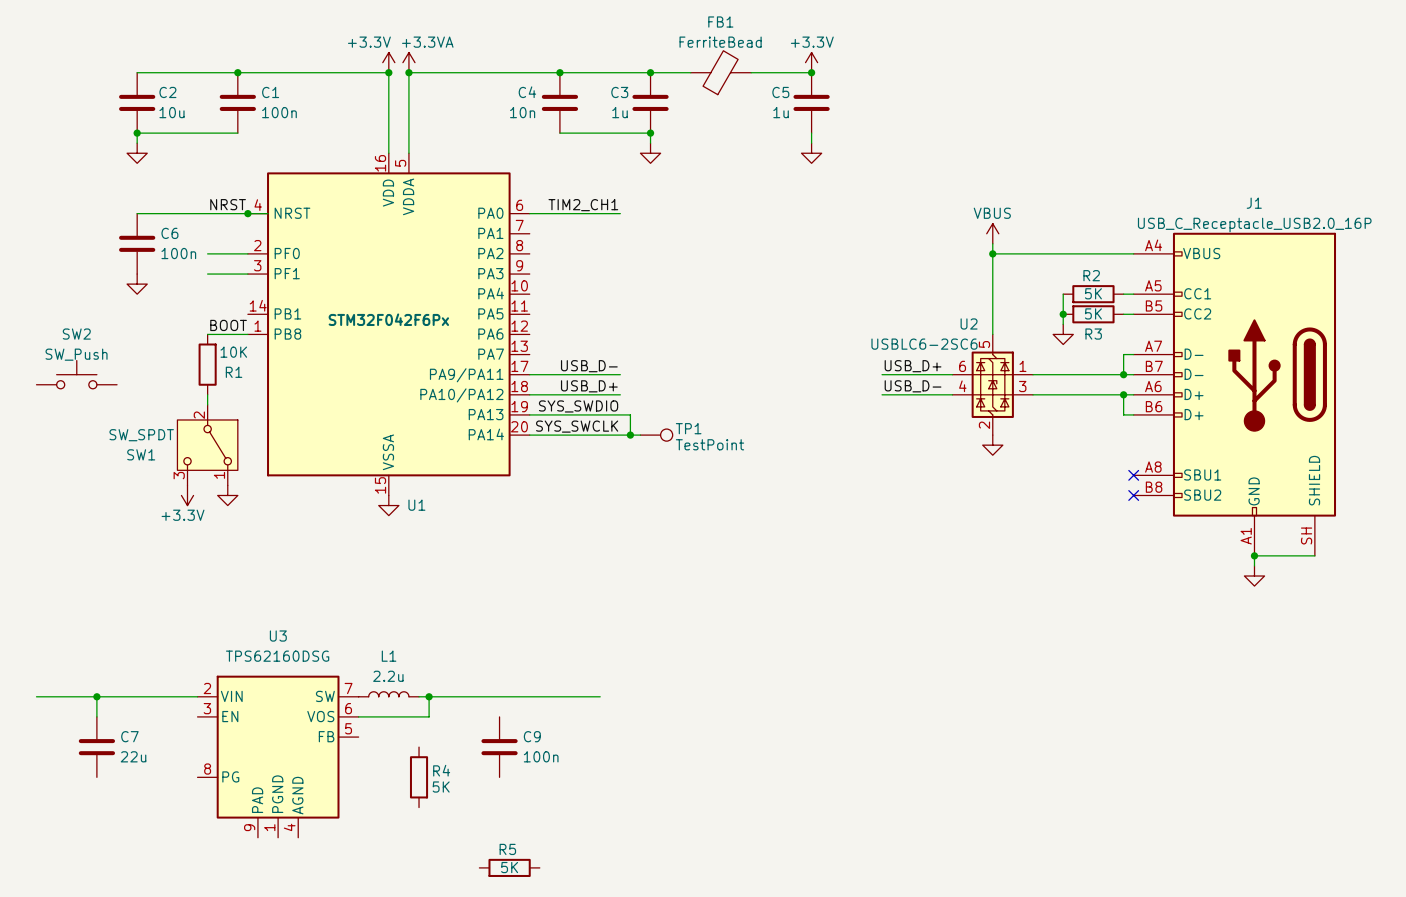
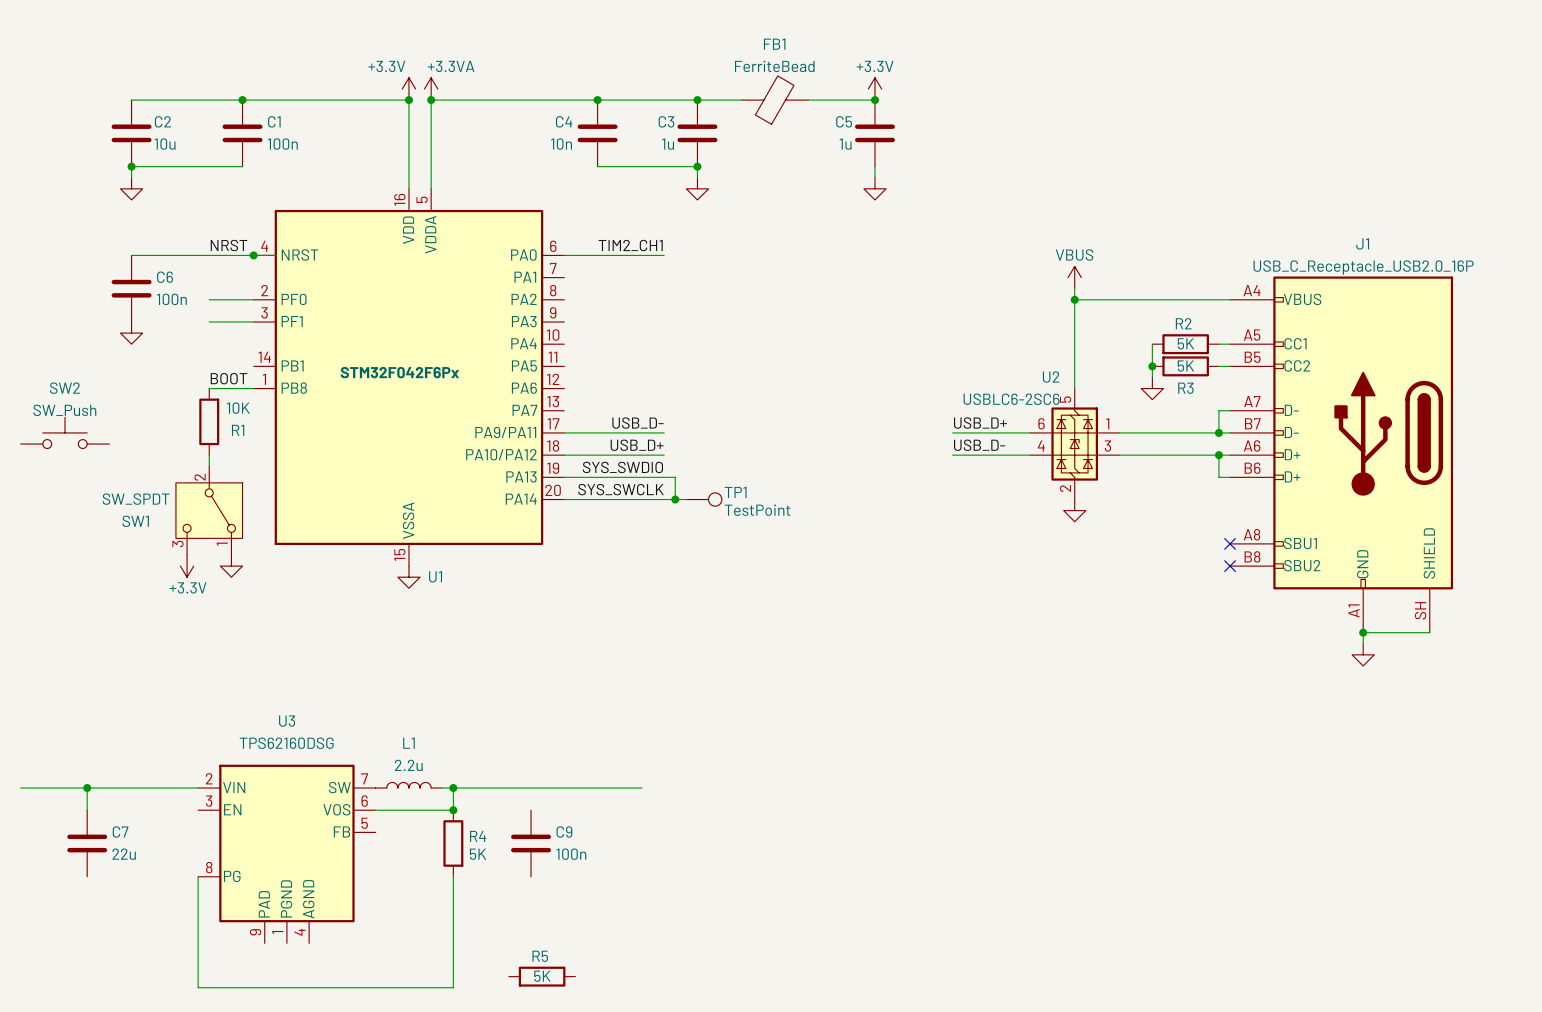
junction: none -> (453, 810)
wire: none -> (198, 876) (198, 987) (453, 987) (453, 876)
R4 position: (419, 777) -> (453, 843)

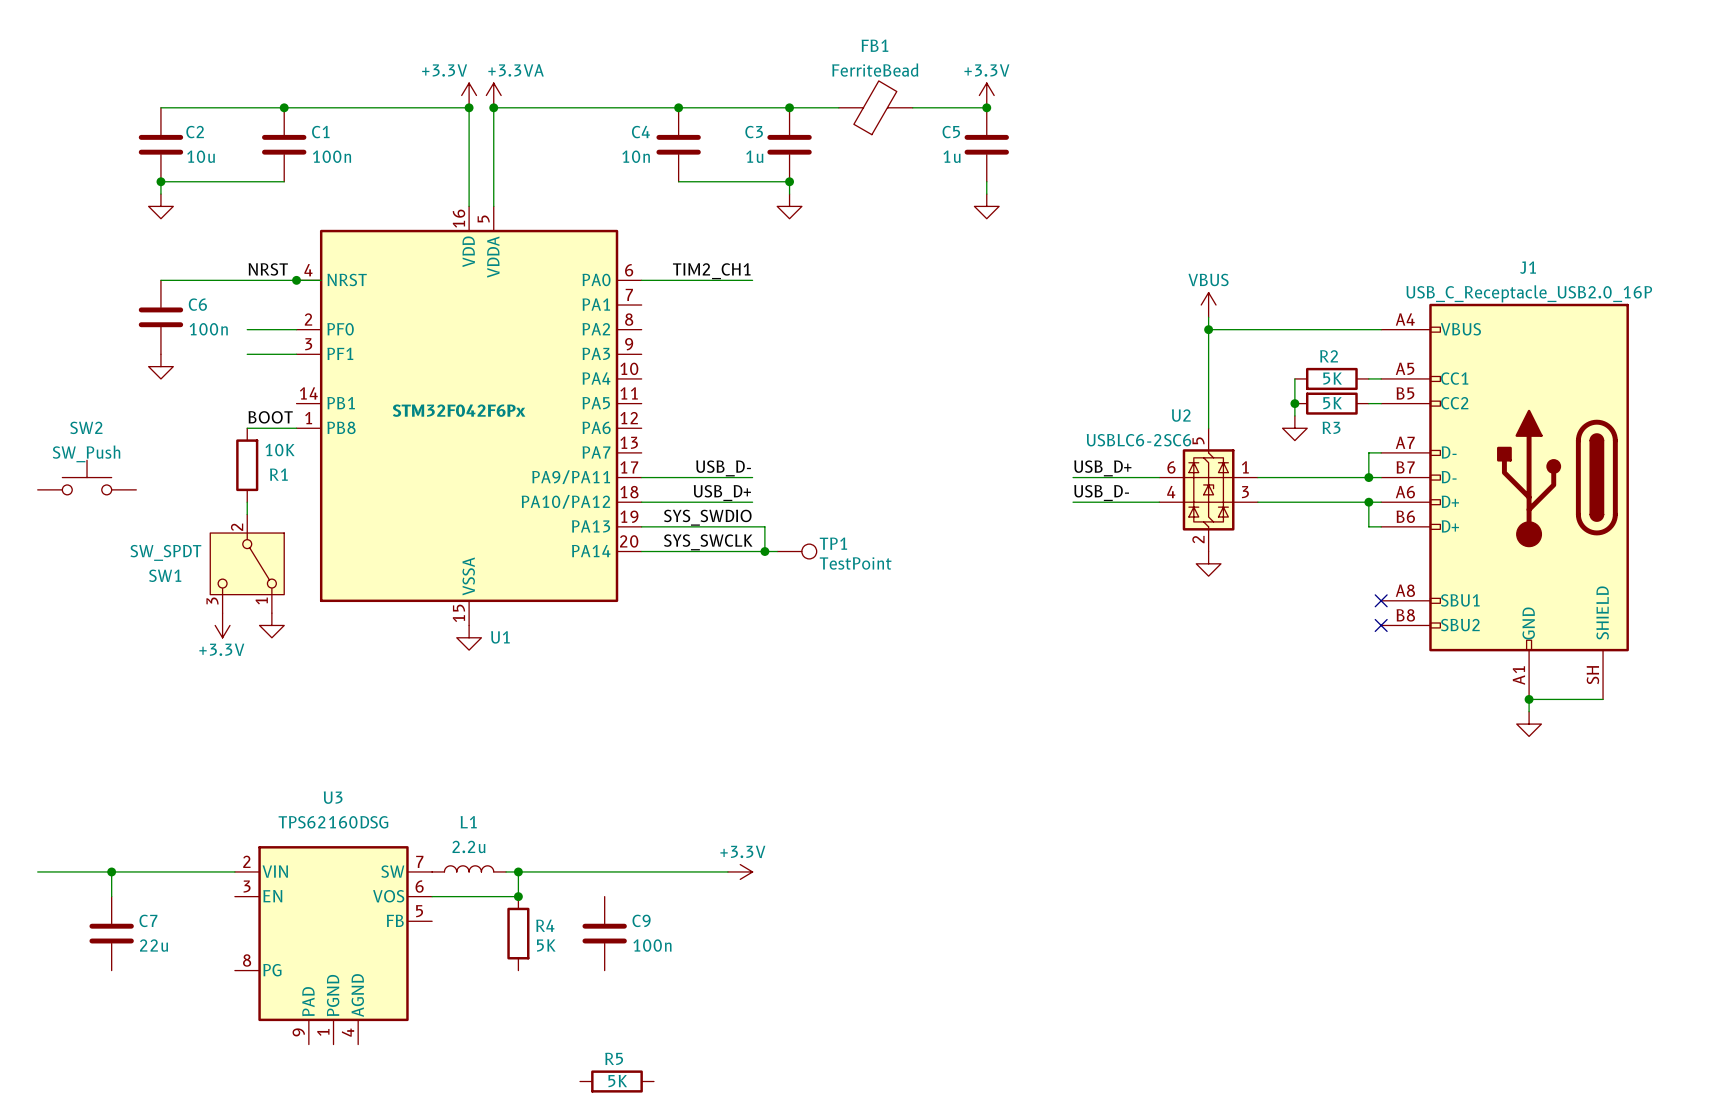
power symbol: none -> +3.3V (740, 871)
wire: (198, 876) (198, 987) (453, 987) (453, 876) -> none

